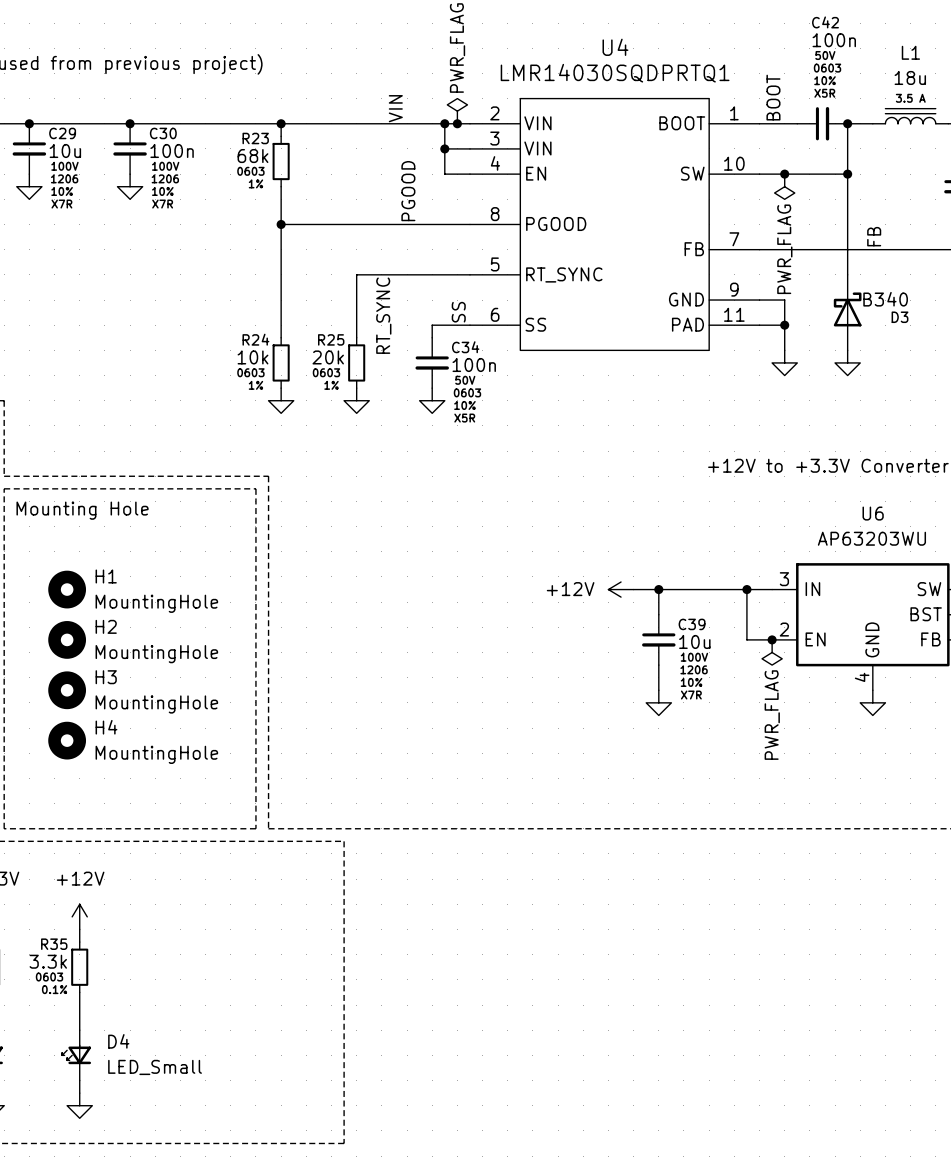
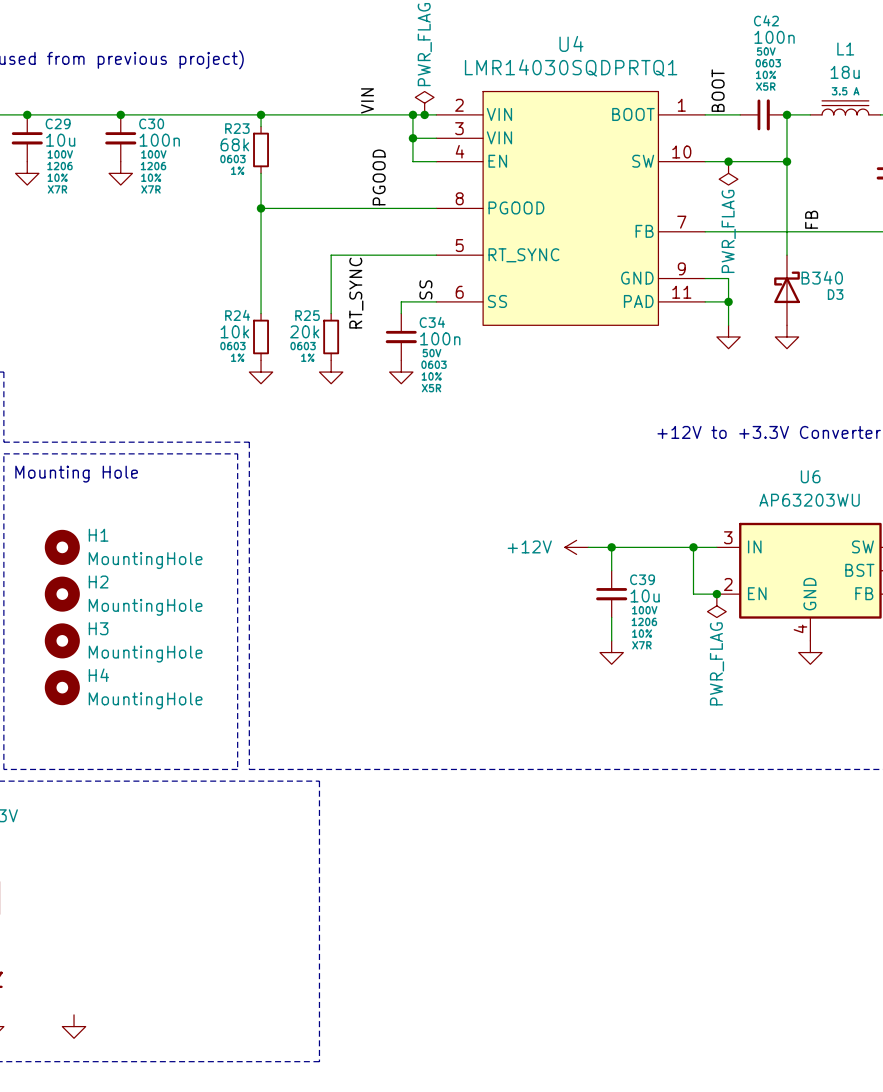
power symbol: +12V (79, 916) -> none
wire: (79, 929) (79, 942) -> none
R35: 3.3k (79, 967) -> none
wire: (79, 992) (79, 1030) -> none
D4: LED_Small (76, 1055) -> none
wire: (79, 1080) (79, 1093) -> none

